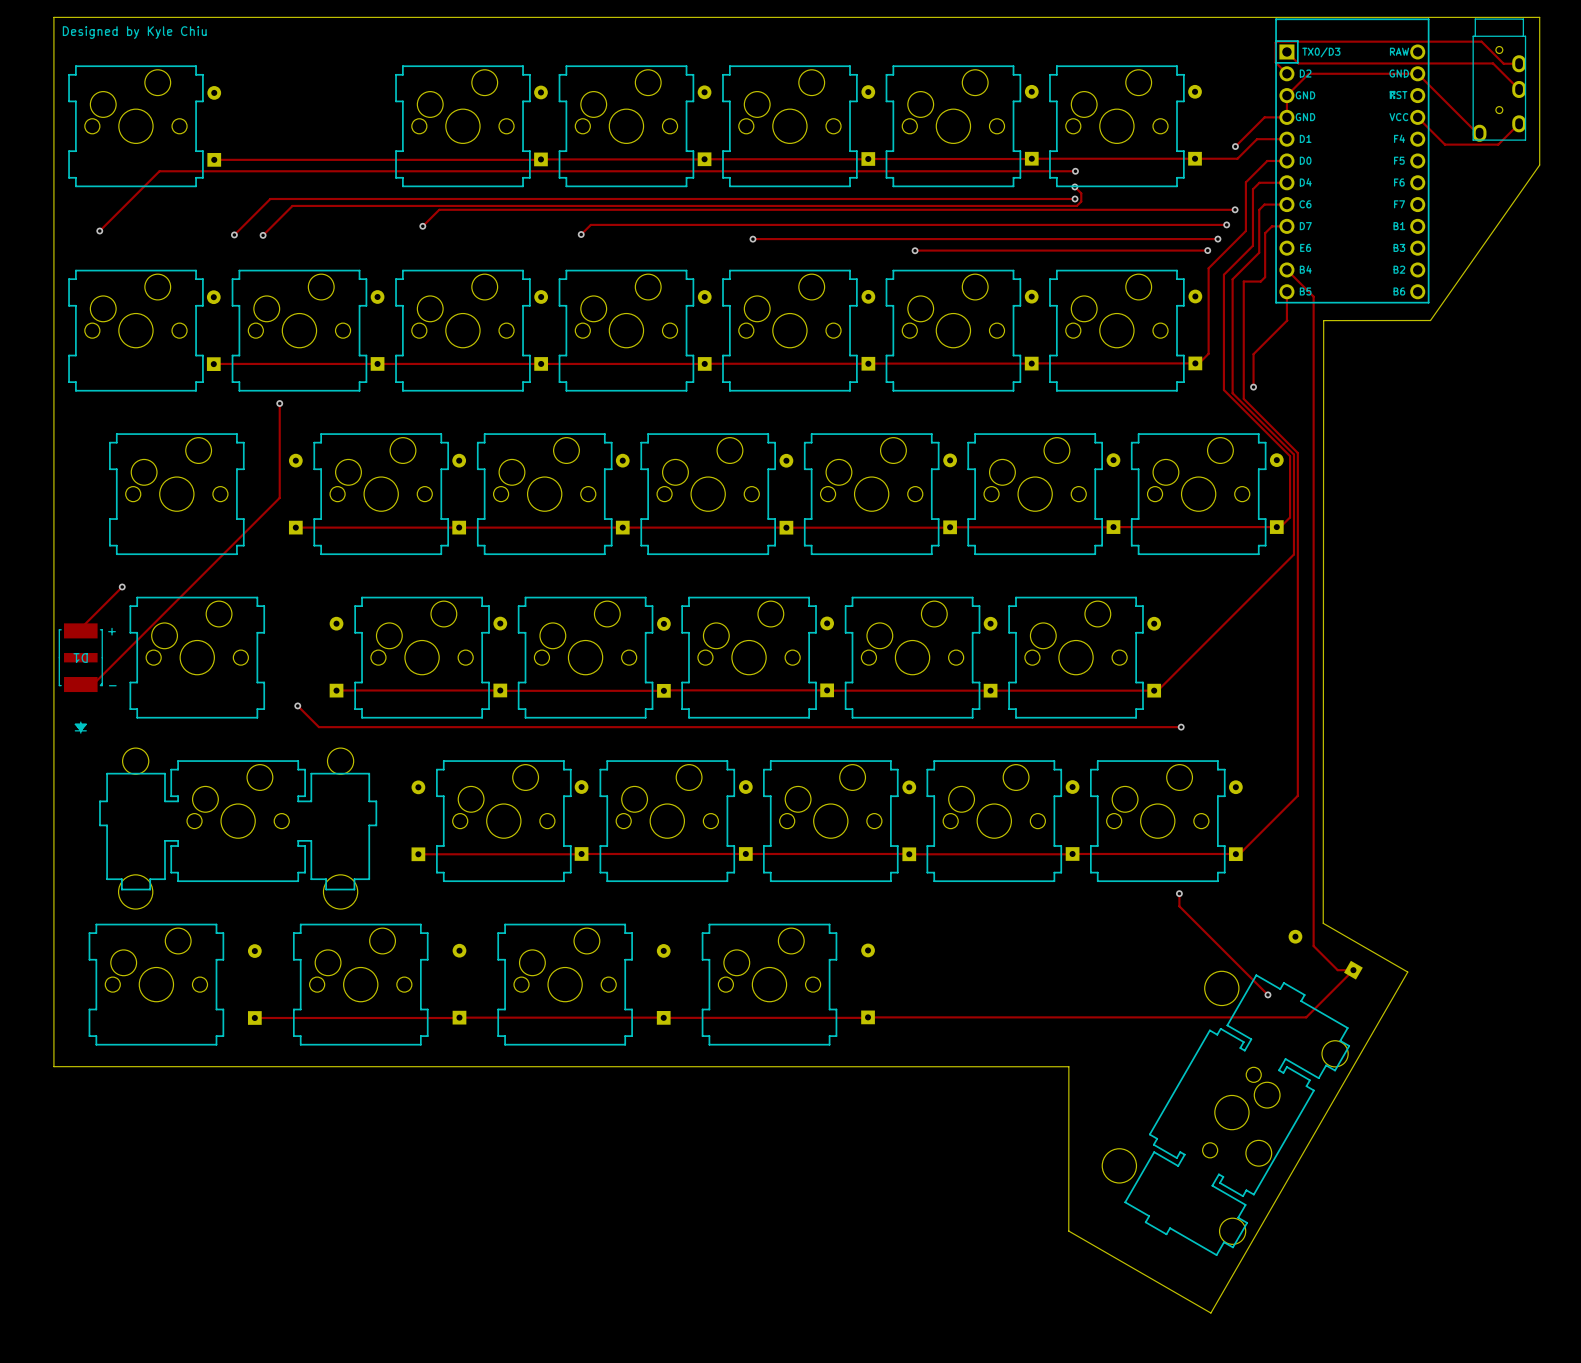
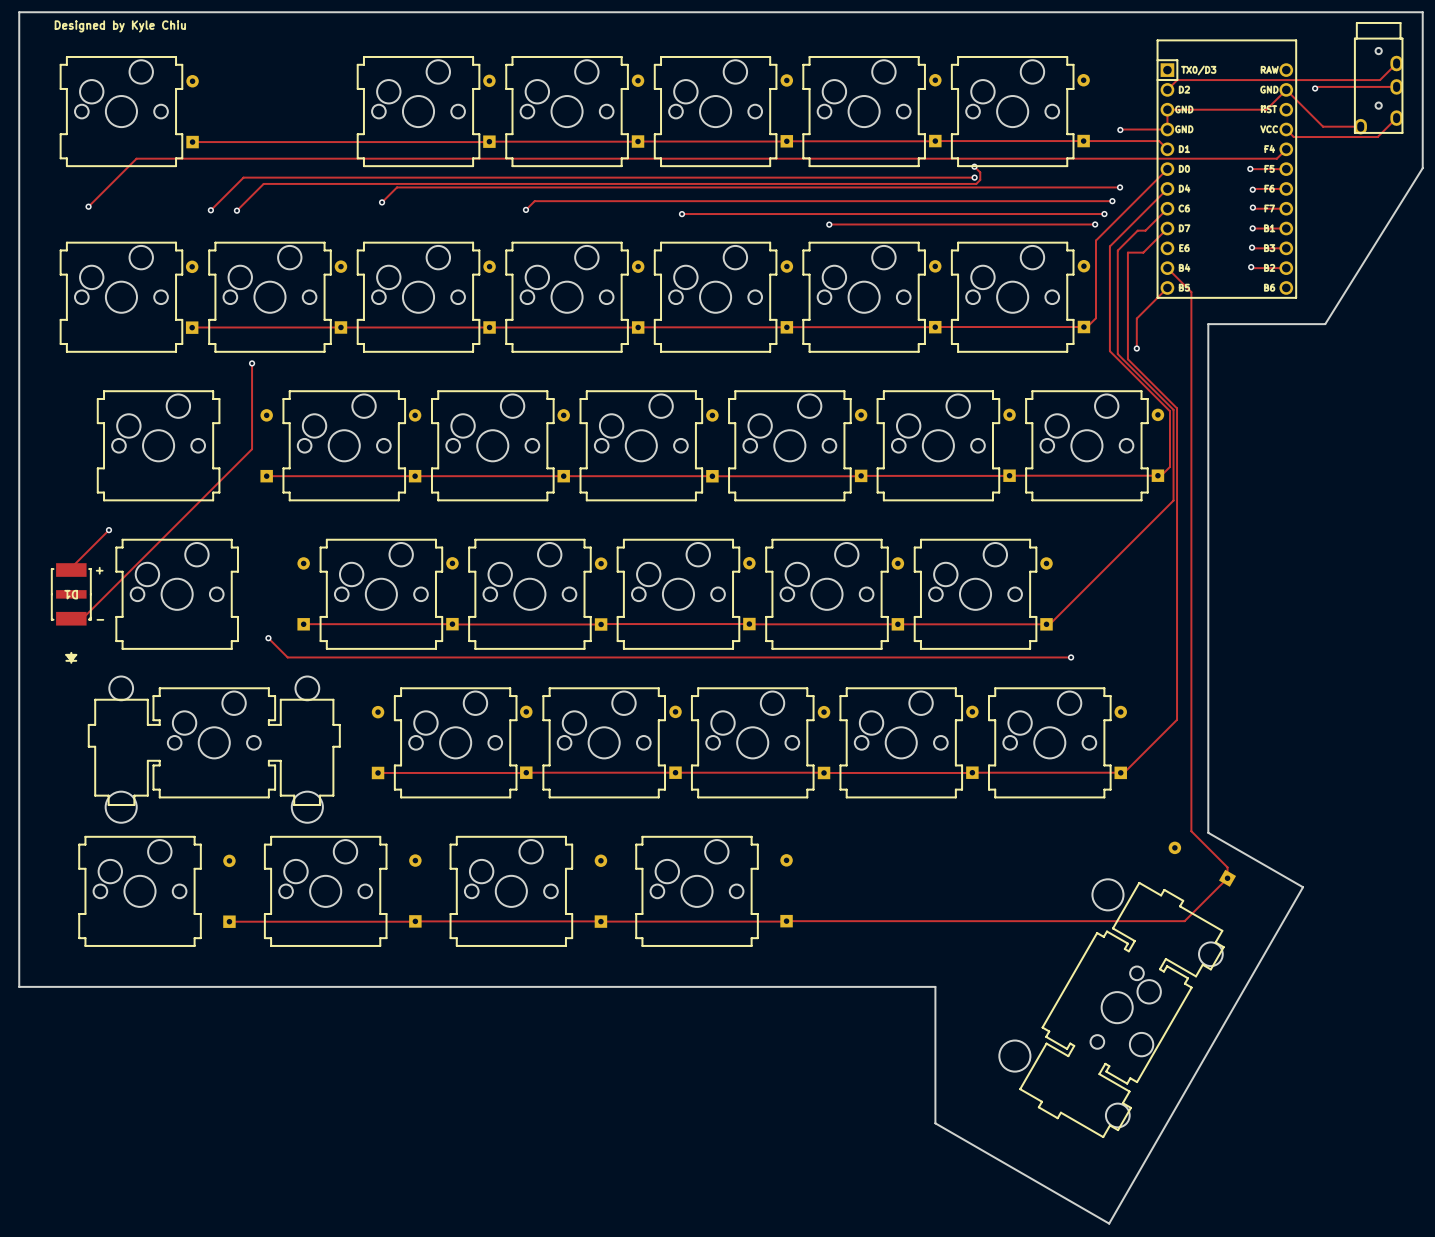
board edge: (53, 17) (53, 1066) (1068, 1066) (1068, 1231) (1210, 1313) (1407, 972) (1323, 923) (1323, 320) (1430, 320) (1539, 165) (1539, 17) (53, 17) -> (19, 12) (19, 986) (935, 986) (935, 1123) (1109, 1223) (1303, 887) (1208, 832) (1208, 324) (1325, 324) (1422, 168) (1422, 12) (19, 12)
track: (1286, 51) (1298, 63) (1493, 63) (1519, 89) -> none
track: (1519, 63) (1503, 63) (1481, 41) (1276, 41) (1275, 62) (1286, 73) -> none
track: none -> (1396, 63) (1380, 80) (1177, 80) (1167, 89)
part position: (1499, 80) -> (1378, 78)
track: none -> (1396, 86) (1316, 86) (1315, 88)
via: none -> (1315, 88)
track: (1417, 117) (1444, 144) (1498, 144) (1519, 123) -> none
track: (1479, 133) (1477, 133) (1417, 73) (1308, 73) (1286, 95) (1286, 117) (1264, 117) (1235, 146) -> (1360, 126) (1323, 126) (1286, 89) (1266, 109) (1167, 109) (1167, 129) (1120, 129)
track: none -> (1396, 118) (1377, 137) (1293, 137) (1286, 129)
track: (1286, 139) (1257, 139) (1237, 158) -> (1167, 149) (1159, 141) (1122, 141)
track: (1286, 160) (1267, 160) (1245, 182) (1245, 231) -> (1167, 169) (1129, 206)
part position: (1352, 160) -> (1226, 169)
track: (1075, 171) (159, 171) (152, 178) -> (1286, 149) (1276, 158) (136, 158)
via: (1075, 171) -> none
track: (1286, 182) (1259, 182) (1252, 189) (1252, 245) -> (1167, 188) (1136, 220)
track: none -> (1250, 168) (1286, 169)
via: none -> (1250, 168)
track: (1286, 204) (1264, 204) (1259, 209) (1259, 252) (1254, 257) -> (1167, 208) (1145, 230) (1137, 230)
track: none -> (1286, 188) (1252, 189)
via: none -> (1252, 189)
track: (1286, 226) (1272, 226) (1265, 233) (1265, 277) -> (1167, 228) (1147, 248)
track: none -> (1252, 207) (1286, 208)
via: none -> (1252, 207)
track: none -> (1252, 228) (1286, 228)
via: none -> (1252, 228)
track: (1286, 269) (1313, 296) (1313, 324) -> (1167, 268) (1191, 292)
track: none -> (1252, 247) (1286, 248)
via: none -> (1252, 247)
track: (1286, 291) (1287, 320) -> none
track: none -> (1251, 267) (1286, 268)
via: none -> (1251, 267)
track: (1179, 893) (1179, 906) (1267, 994) -> none
via: (1179, 893) -> none
track: (1313, 918) (1313, 946) (1337, 970) (1353, 970) -> (1191, 831) (1227, 867) (1227, 878)
via: (1267, 994) -> none

